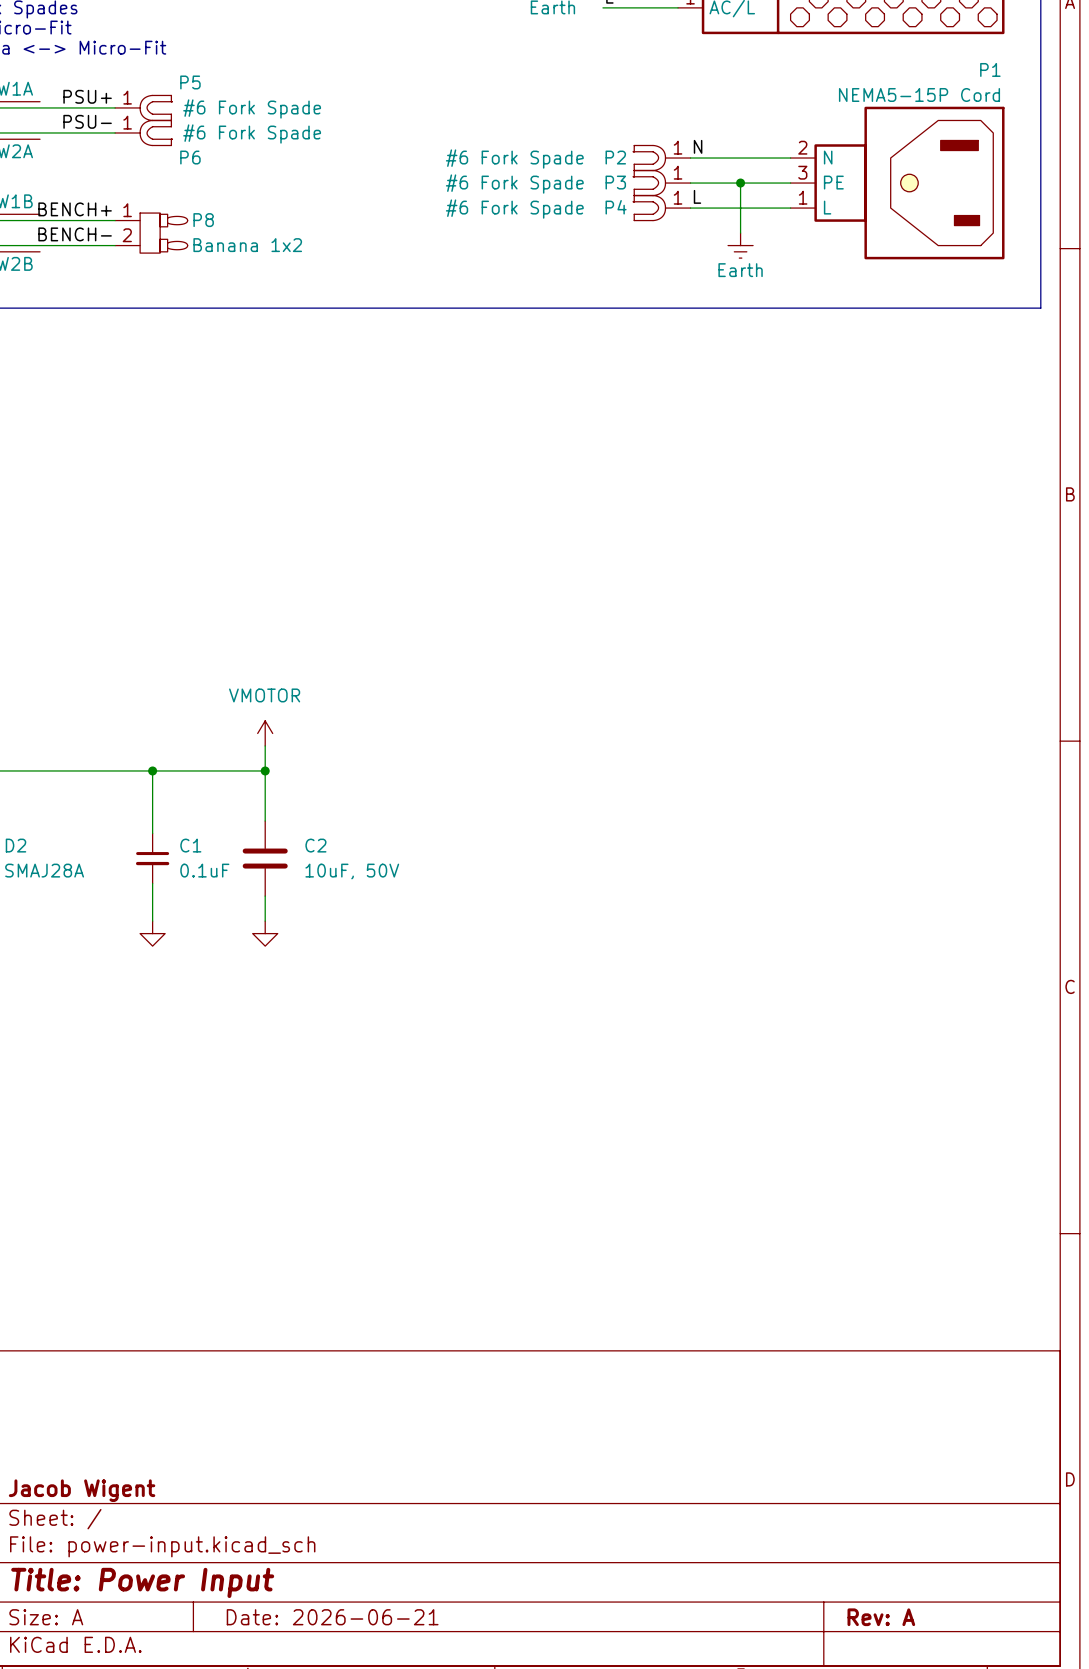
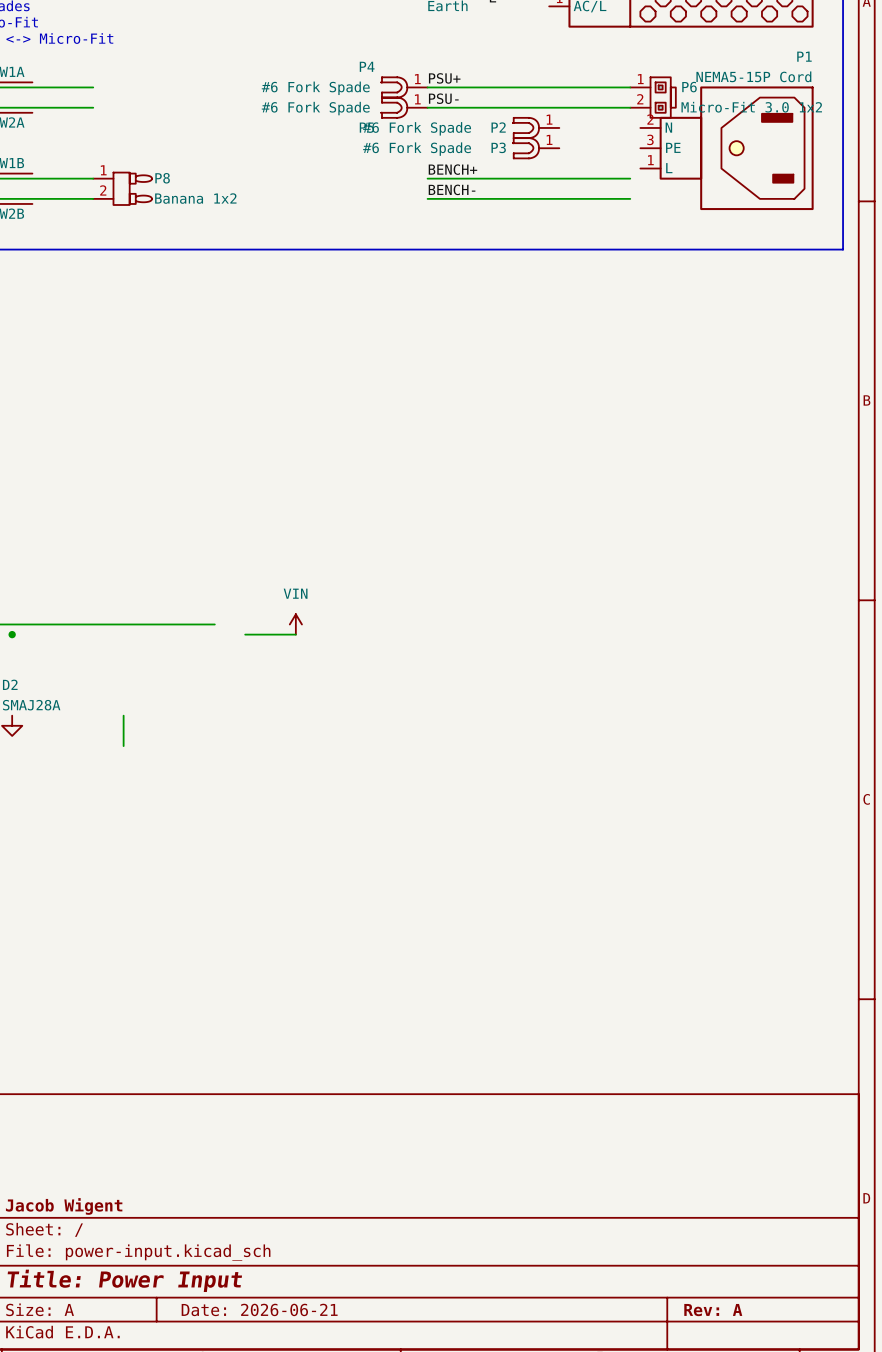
wire: (602, 7) (678, 7) -> none
label: PSU+ (87, 96) -> none
label: none -> PSU+ (444, 78)
P5 position: (143, 107) -> (404, 107)
P5 rotation: 0° (156, 107) -> 180° (394, 107)
wire: none -> (427, 87) (630, 87)
part: none -> (660, 87)
P6 symbol: [115, 120, 173, 146] -> [630, 77, 676, 118]
label: PSU- (87, 121) -> none
label: none -> PSU- (443, 98)
wire: none -> (427, 107) (630, 107)
part: none -> (660, 107)
P6 value: #6 Fork Spade (252, 134) -> Micro-Fit 3.0 1x2 (751, 107)
label: N (698, 146) -> none
P6 name position: P6 (190, 157) -> P6 (689, 87)
wire: (690, 158) (790, 158) -> none
wire: (690, 183) (790, 183) -> none
wire: (740, 183) (740, 233) -> none
junction: (740, 183) -> none
label: L (697, 196) -> none
P4 name position: P4 (616, 207) -> P4 (367, 66)
P4 position: (661, 208) -> (404, 87)
wire: (690, 208) (790, 208) -> none
label: BENCH+ (75, 209) -> none
P4 value position: #6 Fork Spade (514, 209) -> #6 Fork Spade (315, 88)
label: none -> BENCH+ (452, 169)
wire: none -> (427, 178) (630, 178)
label: BENCH- (75, 234) -> none
label: none -> BENCH- (452, 189)
wire: none -> (427, 198) (630, 198)
power symbol: Earth (740, 245) -> none
power symbol: VMOTOR (265, 733) -> none
wire: (265, 745) (265, 821) -> none
wire: (152, 770) (152, 833) -> none
junction: (152, 770) -> none
junction: (265, 770) -> none
power symbol: none -> VIN (295, 624)
junction: none -> (12, 634)
wire: none -> (245, 634) (295, 634)
C1: 0.1uF (152, 858) -> none
C2: 10uF, 50V (265, 858) -> none
power symbol: none -> (12, 725)
wire: (265, 896) (265, 921) -> none
power symbol: (152, 933) -> none
power symbol: (265, 933) -> none

